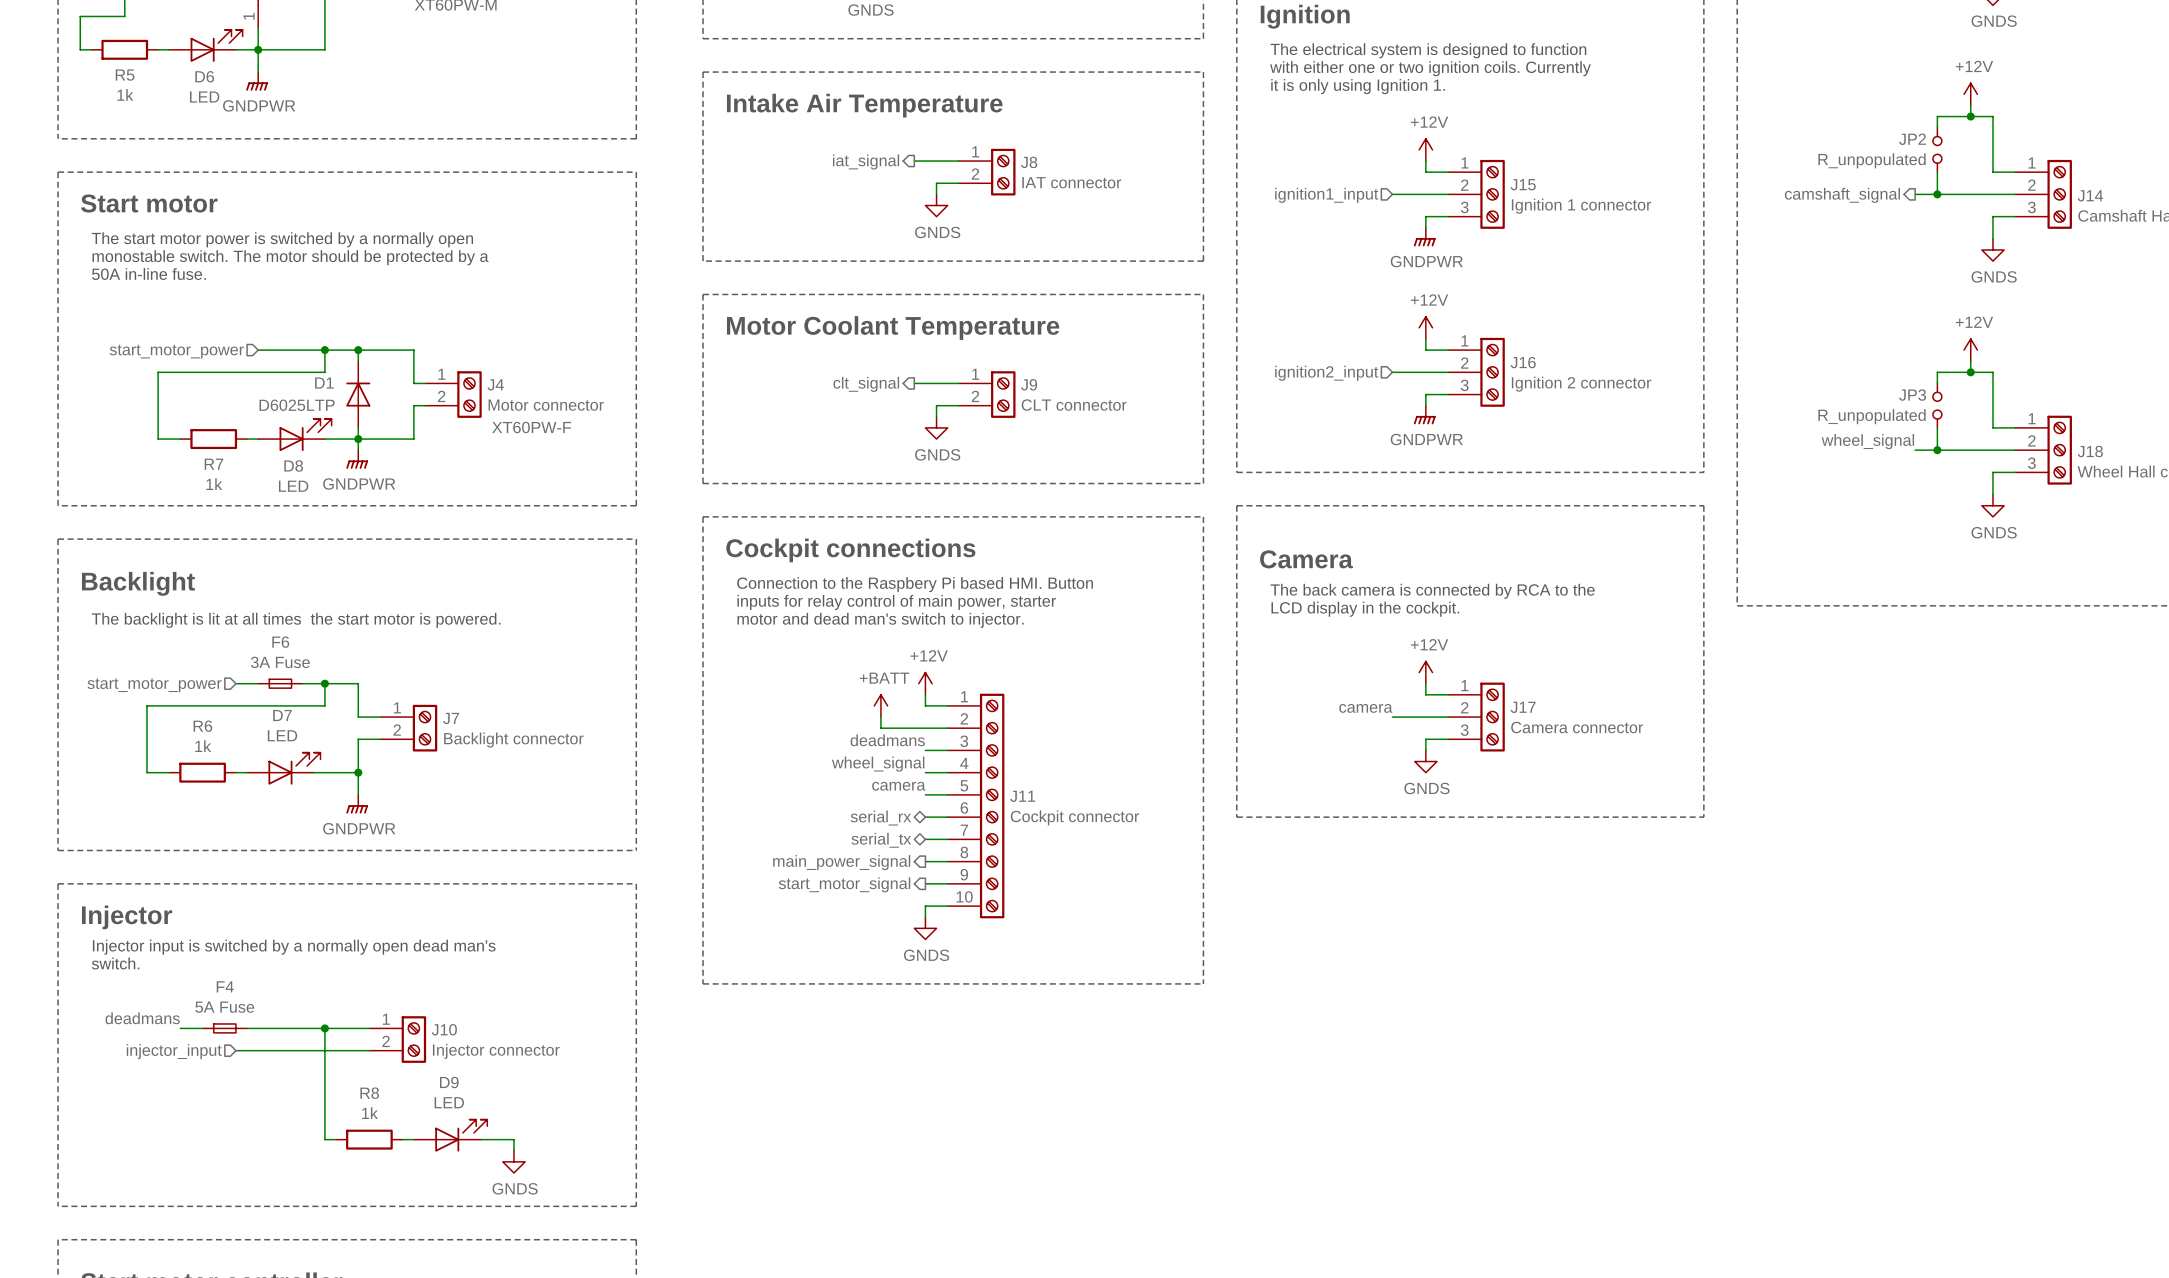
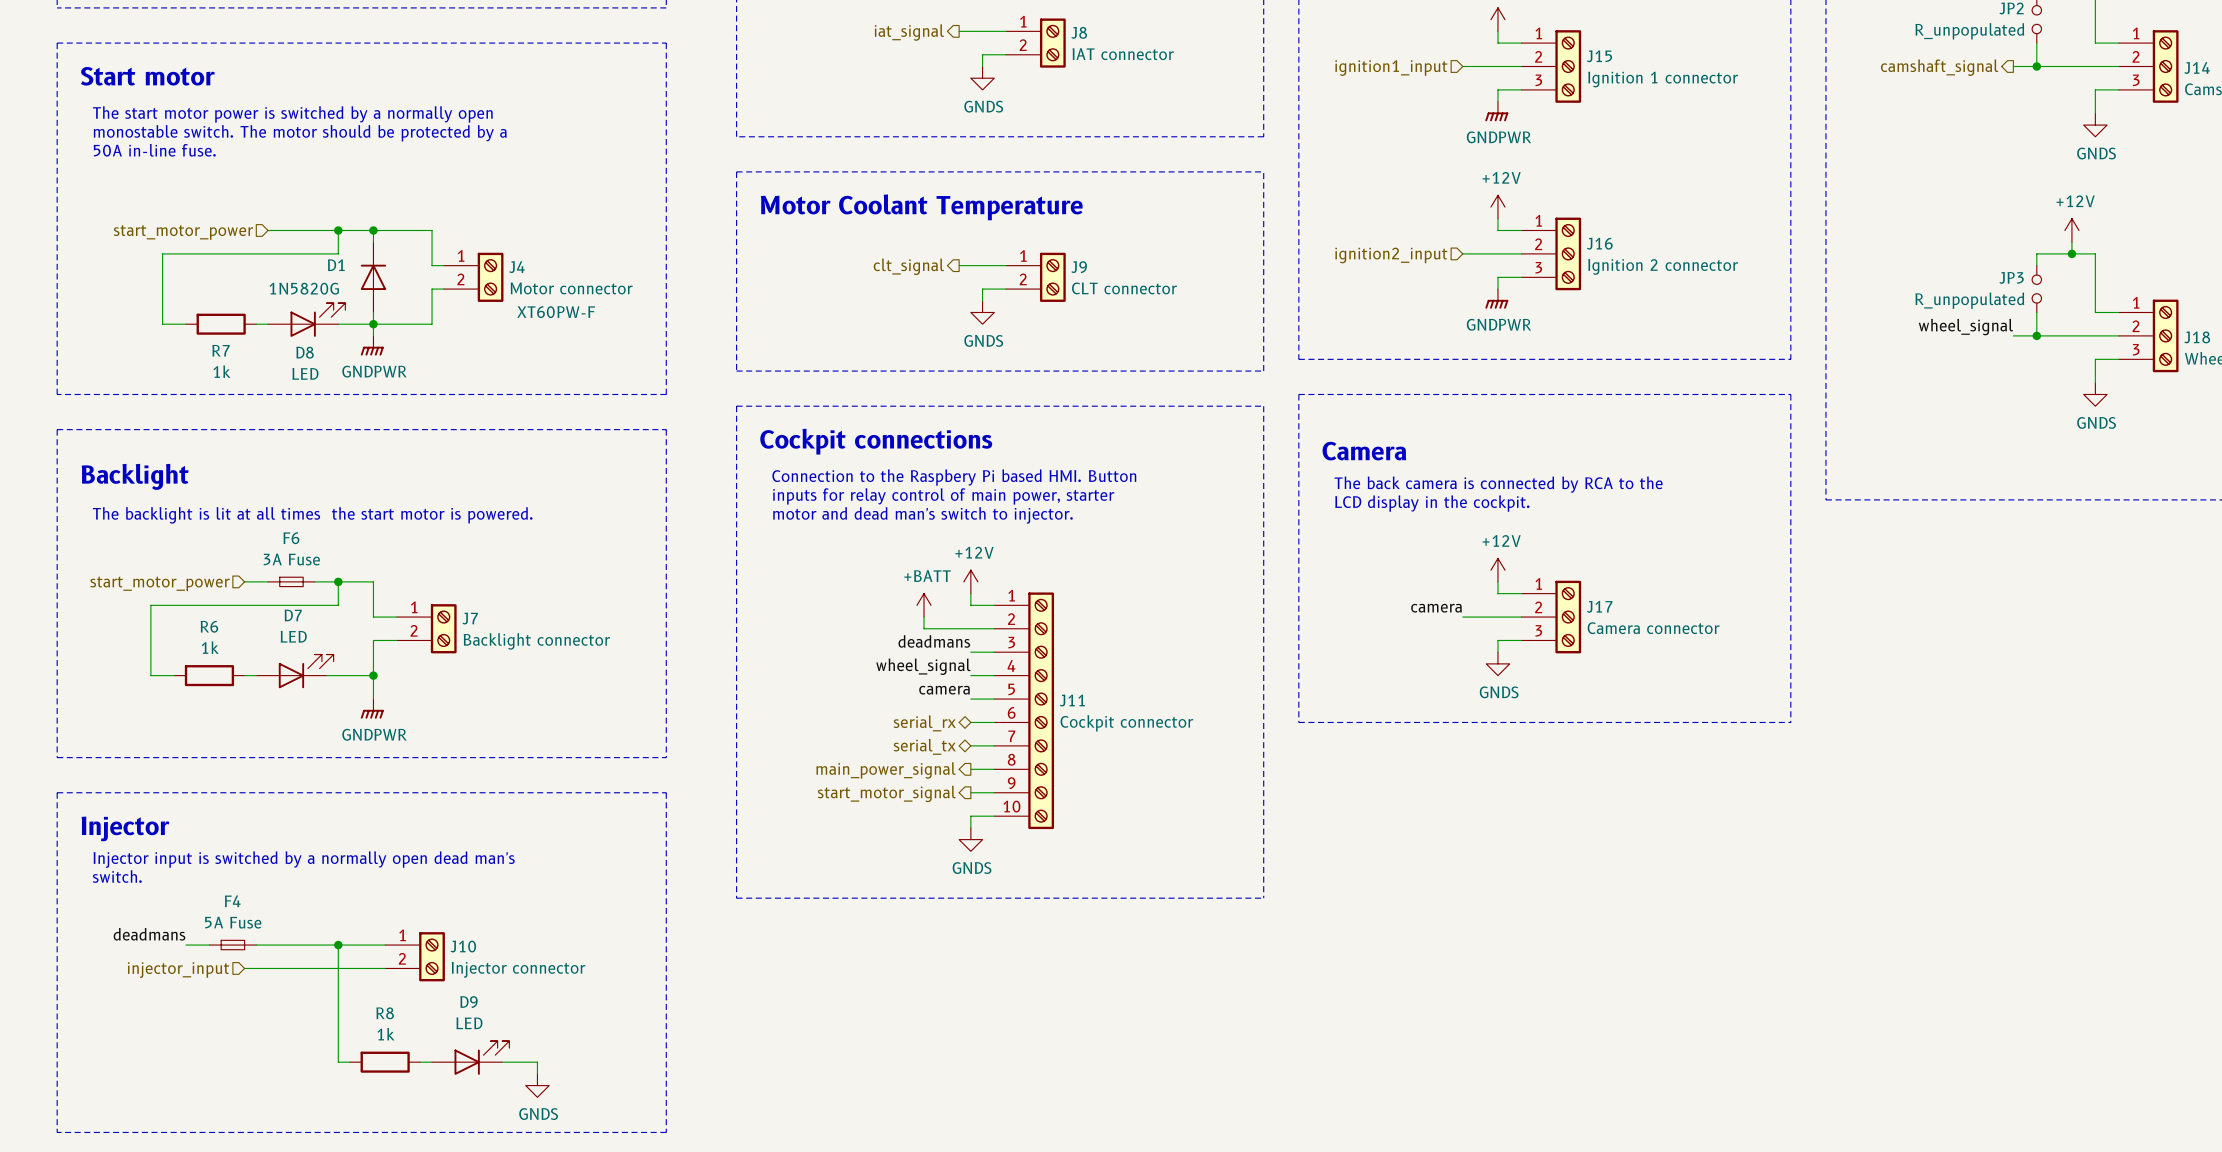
D1 value: D6025LTP (297, 405) -> 1N5820G (304, 288)

